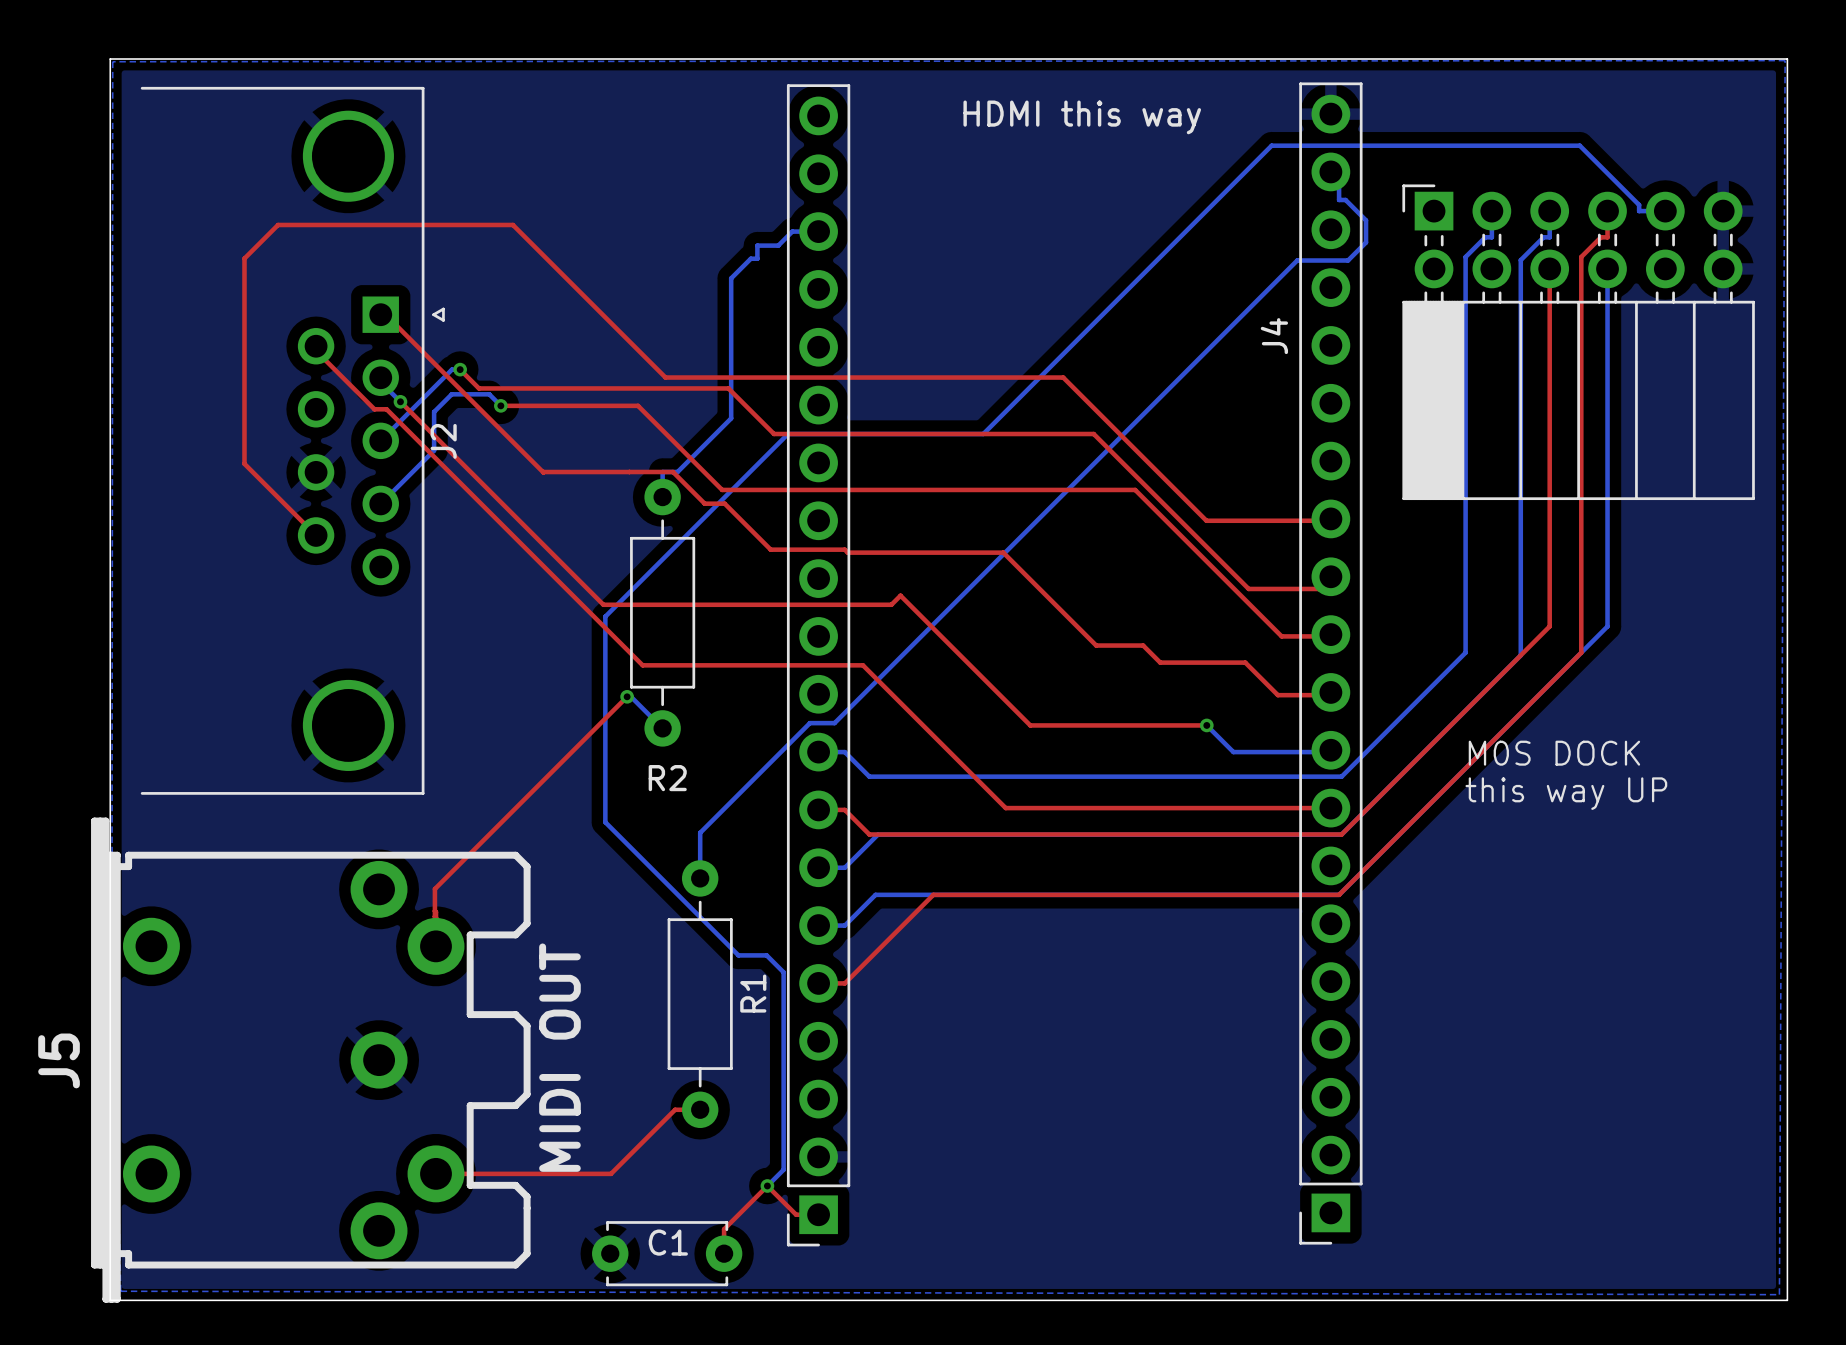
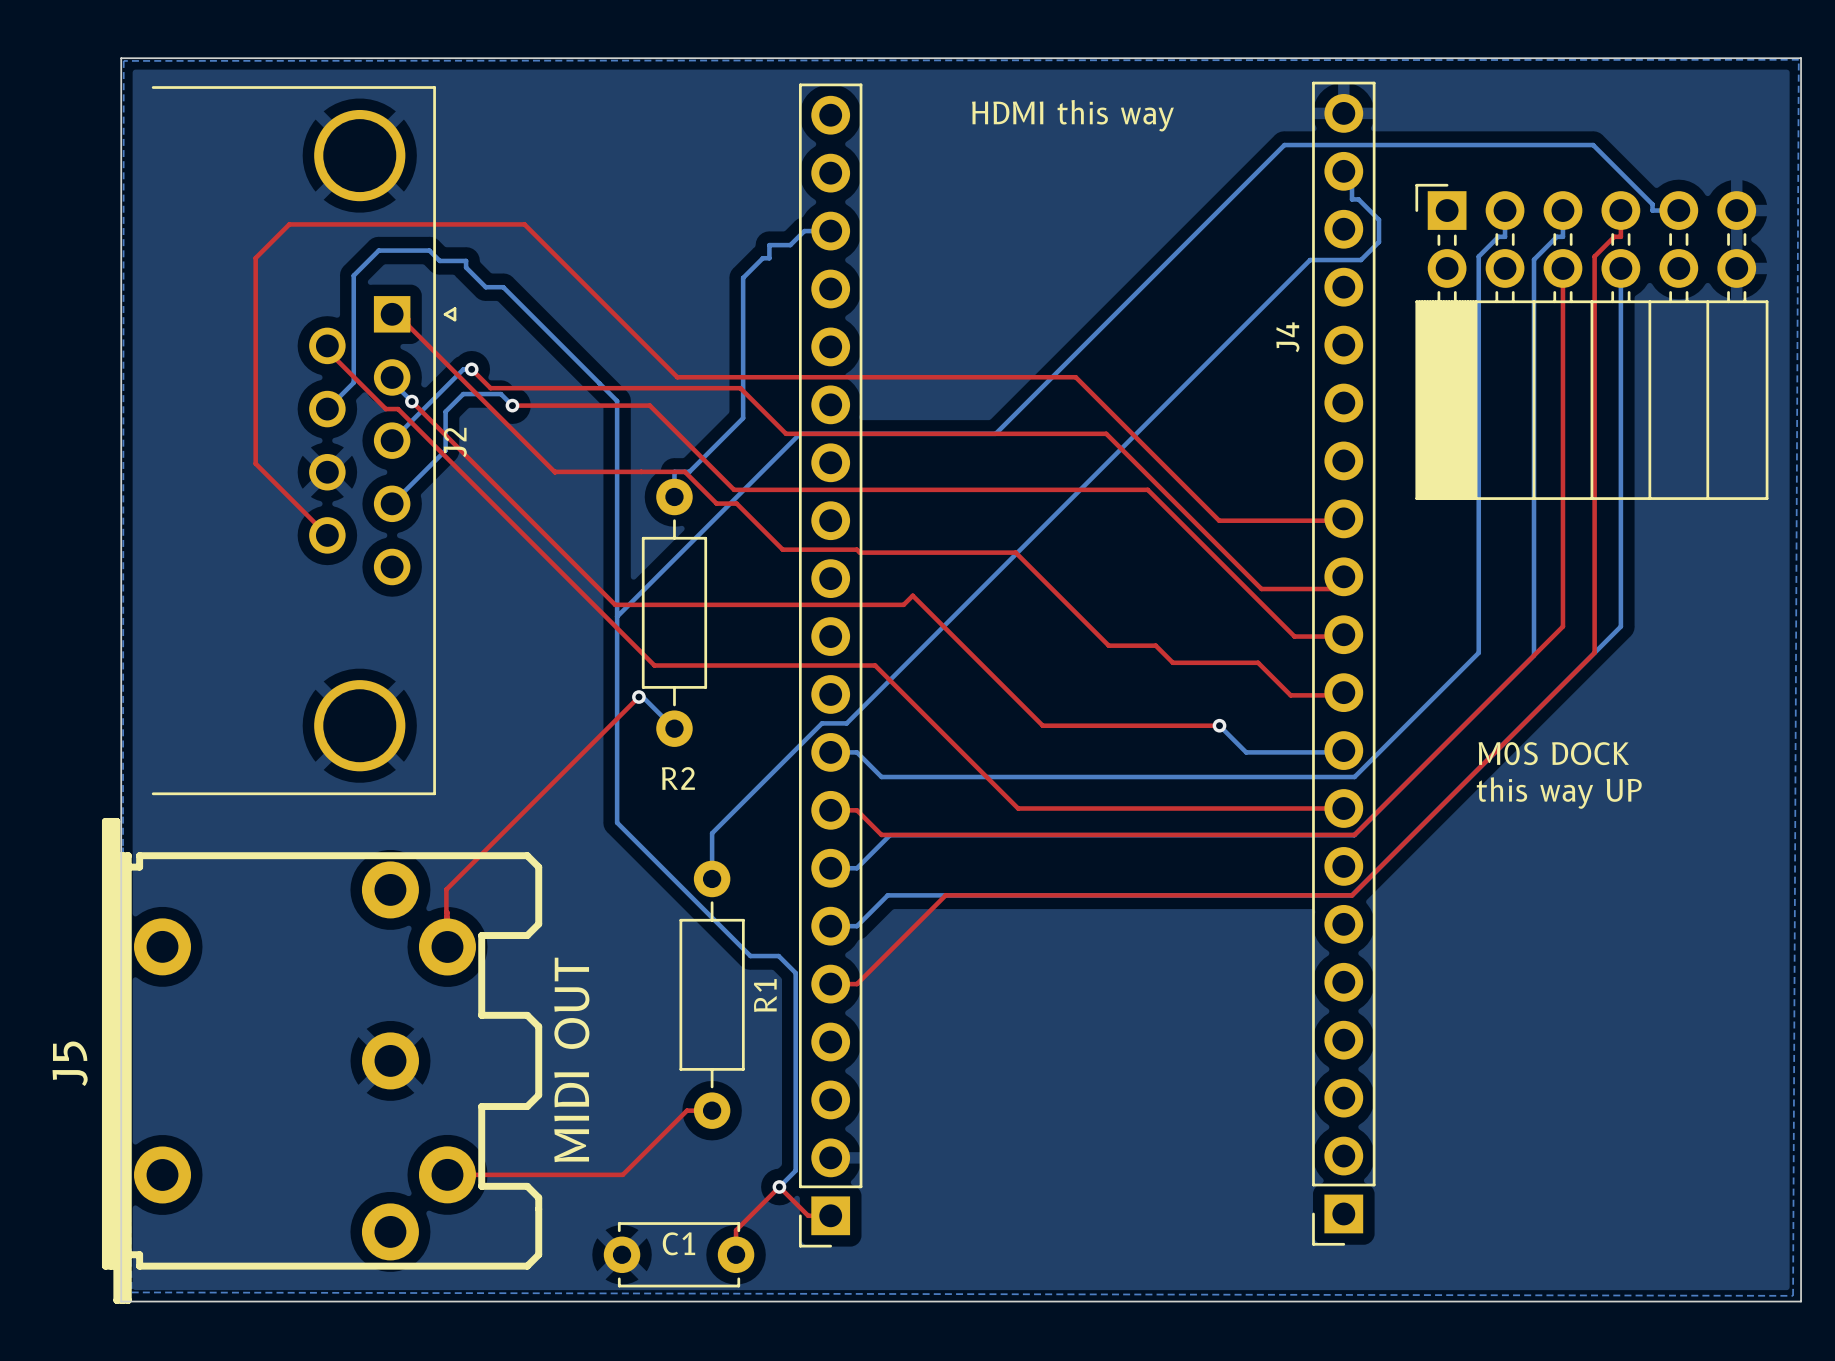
bottom track: none -> (327, 409) (353, 382) (353, 275) (378, 250) (429, 250) (439, 260) (466, 260) (466, 267) (485, 287) (503, 287) (617, 401) (617, 616)

